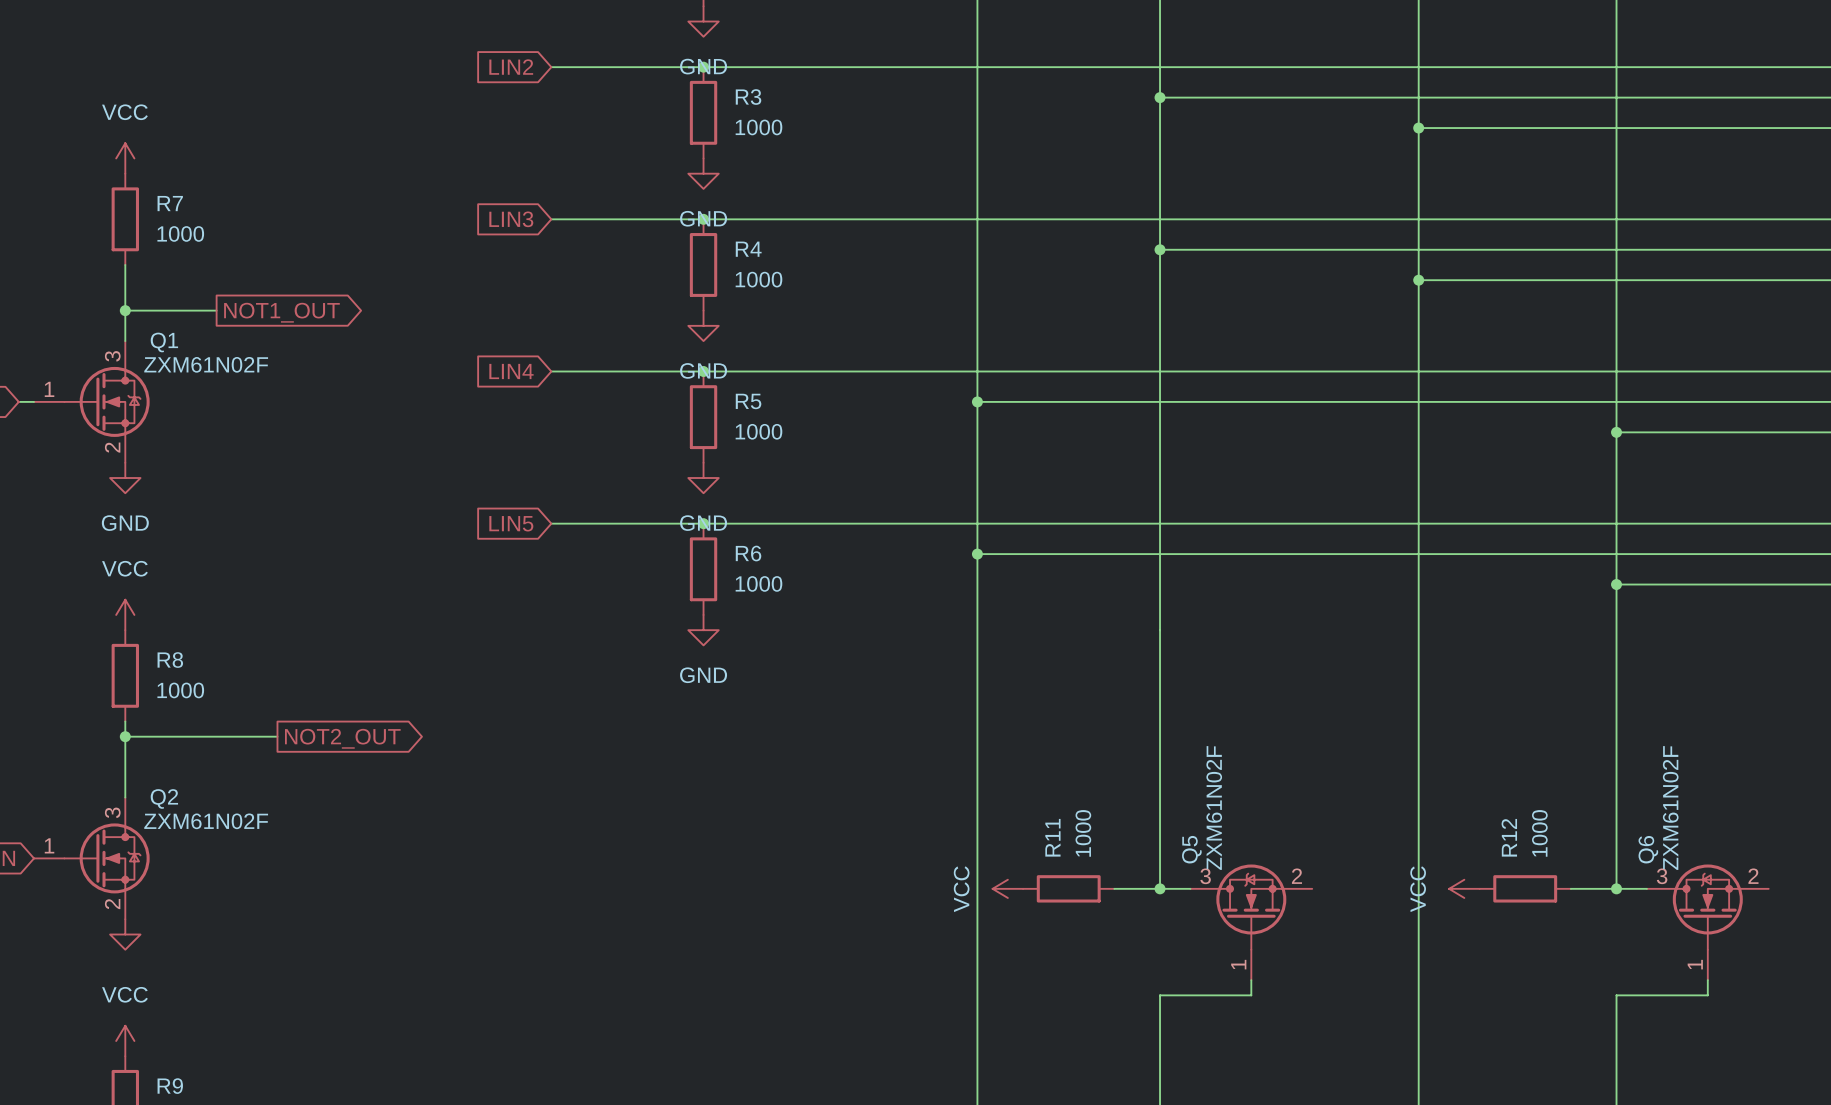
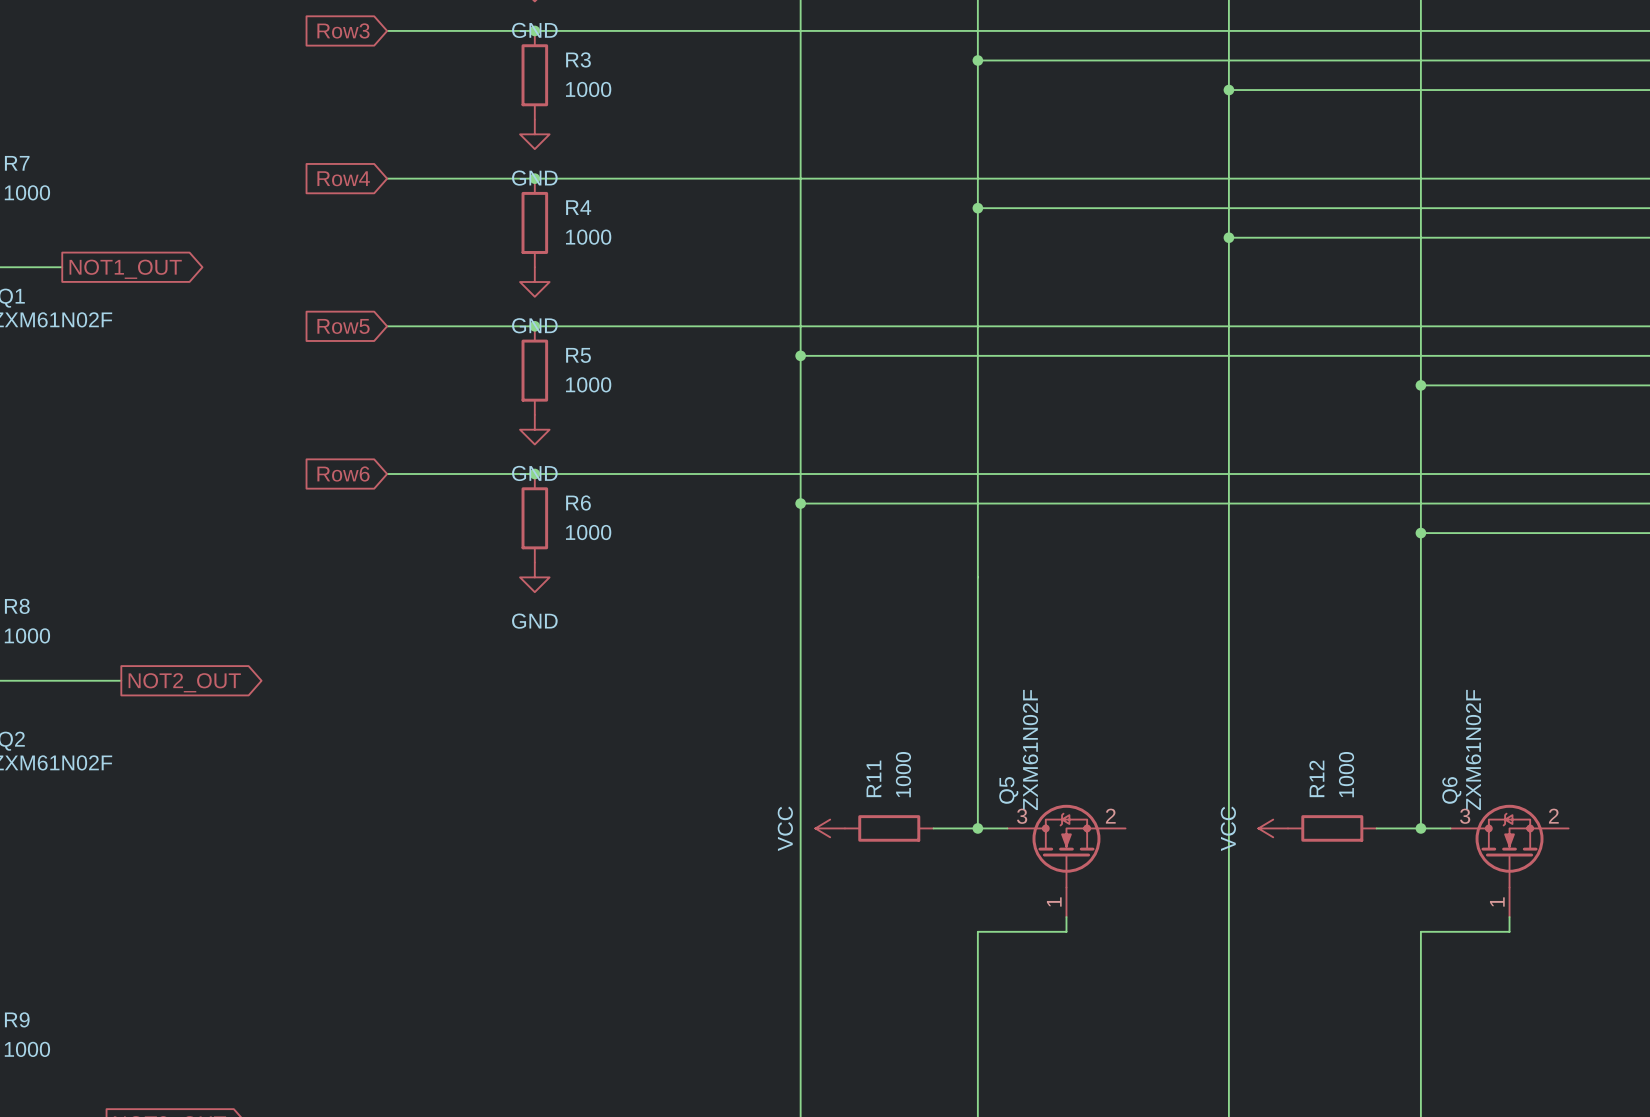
global label: LIN2 (511, 67) -> Row3 (343, 30)
global label: LIN3 (511, 219) -> Row4 (343, 178)
global label: LIN4 (511, 371) -> Row5 (343, 326)
global label: LIN5 (511, 523) -> Row6 (343, 474)

